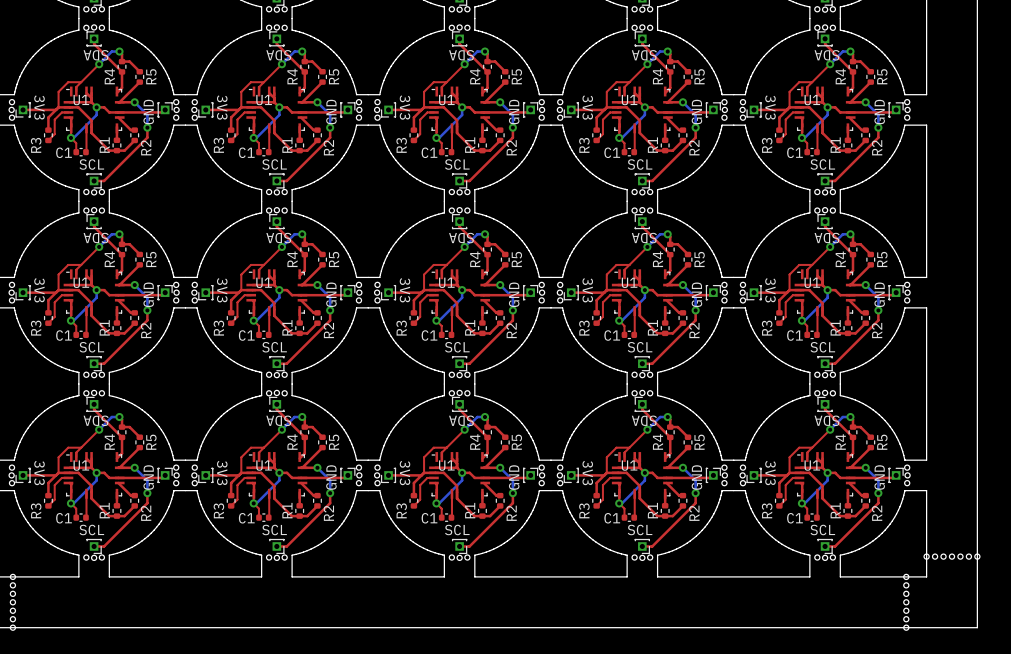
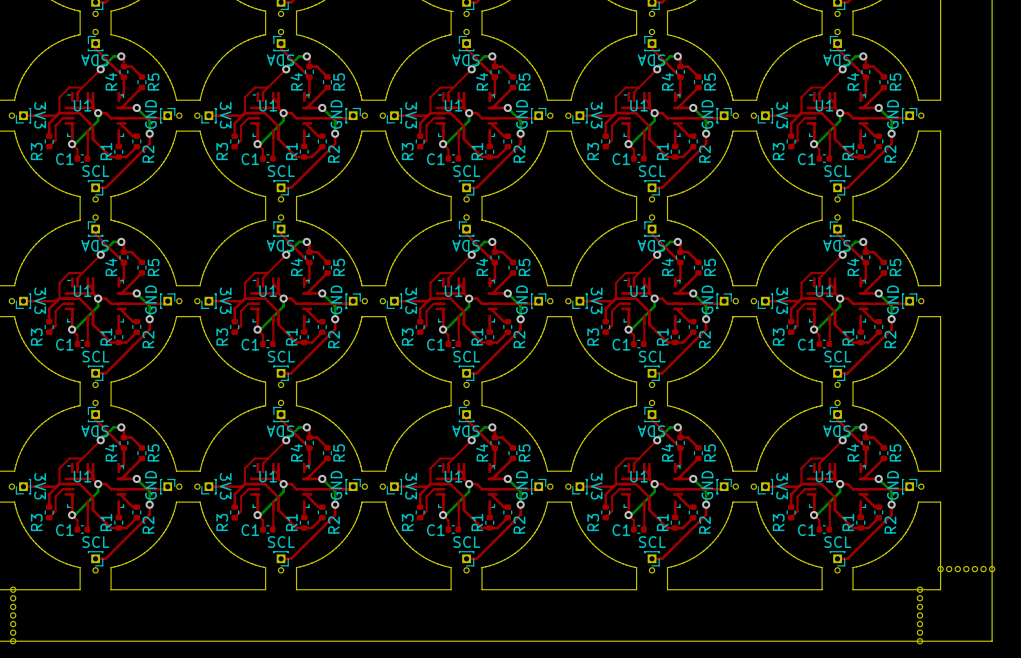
part: (86, 9) -> none
part: (101, 9) -> none
part: (269, 9) -> none
part: (284, 9) -> none
part: (451, 9) -> none
part: (467, 9) -> none
part: (634, 9) -> none
part: (650, 9) -> none
part: (817, 9) -> none
part: (832, 9) -> none
part: (86, 27) -> none
part: (101, 27) -> none
part: (269, 27) -> none
part: (284, 27) -> none
part: (451, 27) -> none
part: (467, 27) -> none
part: (634, 27) -> none
part: (650, 27) -> none
part: (817, 27) -> none
part: (832, 27) -> none
part: (12, 102) -> none
part: (176, 102) -> none
part: (194, 102) -> none
part: (358, 102) -> none
part: (377, 102) -> none
part: (541, 102) -> none
part: (560, 102) -> none
part: (724, 102) -> none
part: (742, 102) -> none
part: (907, 102) -> none
part: (12, 117) -> none
part: (176, 117) -> none
part: (194, 117) -> none
part: (358, 117) -> none
part: (377, 117) -> none
part: (541, 117) -> none
part: (560, 117) -> none
part: (724, 117) -> none
part: (742, 117) -> none
part: (907, 117) -> none
part: (86, 192) -> none
part: (101, 192) -> none
part: (269, 192) -> none
part: (284, 192) -> none
part: (451, 192) -> none
part: (467, 192) -> none
part: (634, 192) -> none
part: (650, 192) -> none
part: (817, 192) -> none
part: (832, 192) -> none
part: (86, 210) -> none
part: (101, 210) -> none
part: (269, 210) -> none
part: (284, 210) -> none
part: (451, 210) -> none
part: (467, 210) -> none
part: (634, 210) -> none
part: (650, 210) -> none
part: (817, 210) -> none
part: (832, 210) -> none
part: (12, 284) -> none
part: (176, 284) -> none
part: (194, 284) -> none
part: (358, 284) -> none
part: (377, 284) -> none
part: (541, 284) -> none
part: (560, 284) -> none
part: (724, 284) -> none
part: (742, 284) -> none
part: (907, 284) -> none
part: (12, 300) -> none
part: (176, 300) -> none
part: (194, 300) -> none
part: (358, 300) -> none
part: (377, 300) -> none
part: (541, 300) -> none
part: (560, 300) -> none
part: (724, 300) -> none
part: (742, 300) -> none
part: (907, 300) -> none
part: (86, 374) -> none
part: (101, 374) -> none
part: (269, 374) -> none
part: (284, 374) -> none
part: (451, 374) -> none
part: (467, 374) -> none
part: (634, 374) -> none
part: (650, 374) -> none
part: (817, 374) -> none
part: (832, 374) -> none
part: (86, 393) -> none
part: (101, 393) -> none
part: (269, 393) -> none
part: (284, 393) -> none
part: (451, 393) -> none
part: (467, 393) -> none
part: (634, 393) -> none
part: (650, 393) -> none
part: (817, 393) -> none
part: (832, 393) -> none
part: (12, 467) -> none
part: (176, 467) -> none
part: (194, 467) -> none
part: (358, 467) -> none
part: (377, 467) -> none
part: (541, 467) -> none
part: (560, 467) -> none
part: (724, 467) -> none
part: (742, 467) -> none
part: (907, 467) -> none
part: (12, 483) -> none
part: (176, 483) -> none
part: (194, 483) -> none
part: (358, 483) -> none
part: (377, 483) -> none
part: (541, 483) -> none
part: (560, 483) -> none
part: (724, 483) -> none
part: (742, 483) -> none
part: (907, 483) -> none
part: (86, 557) -> none
part: (101, 557) -> none
part: (269, 557) -> none
part: (284, 557) -> none
part: (451, 557) -> none
part: (467, 557) -> none
part: (634, 557) -> none
part: (650, 557) -> none
part: (817, 557) -> none
part: (832, 557) -> none

